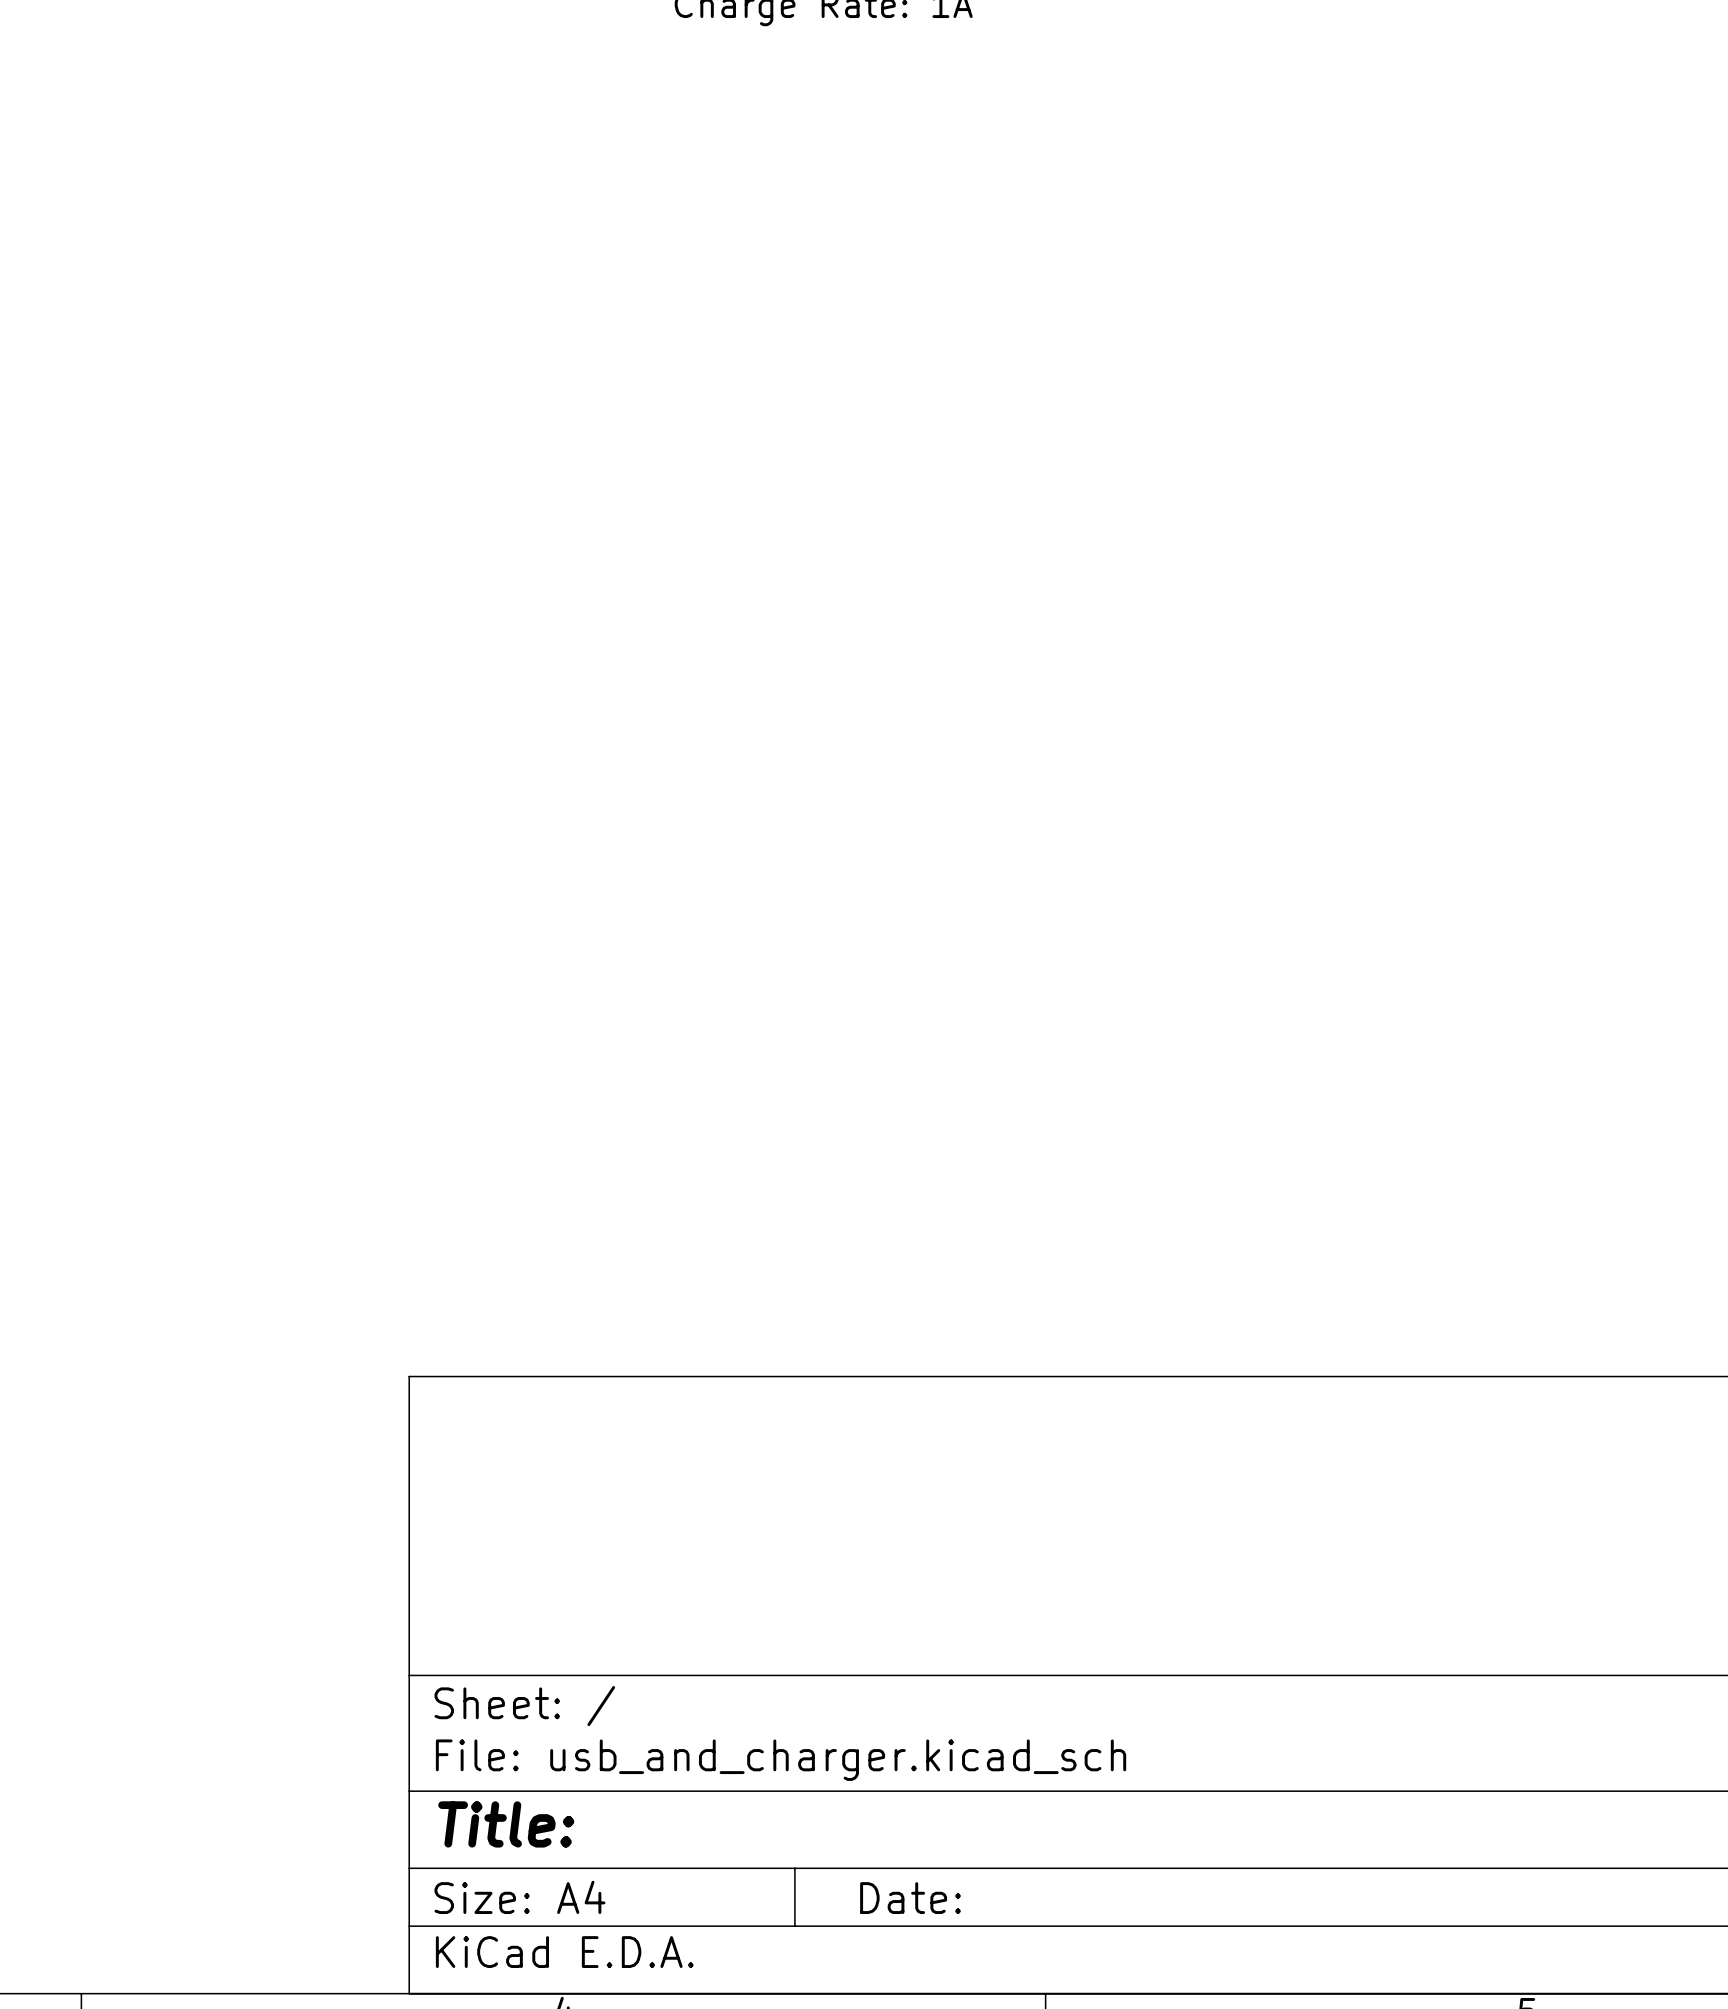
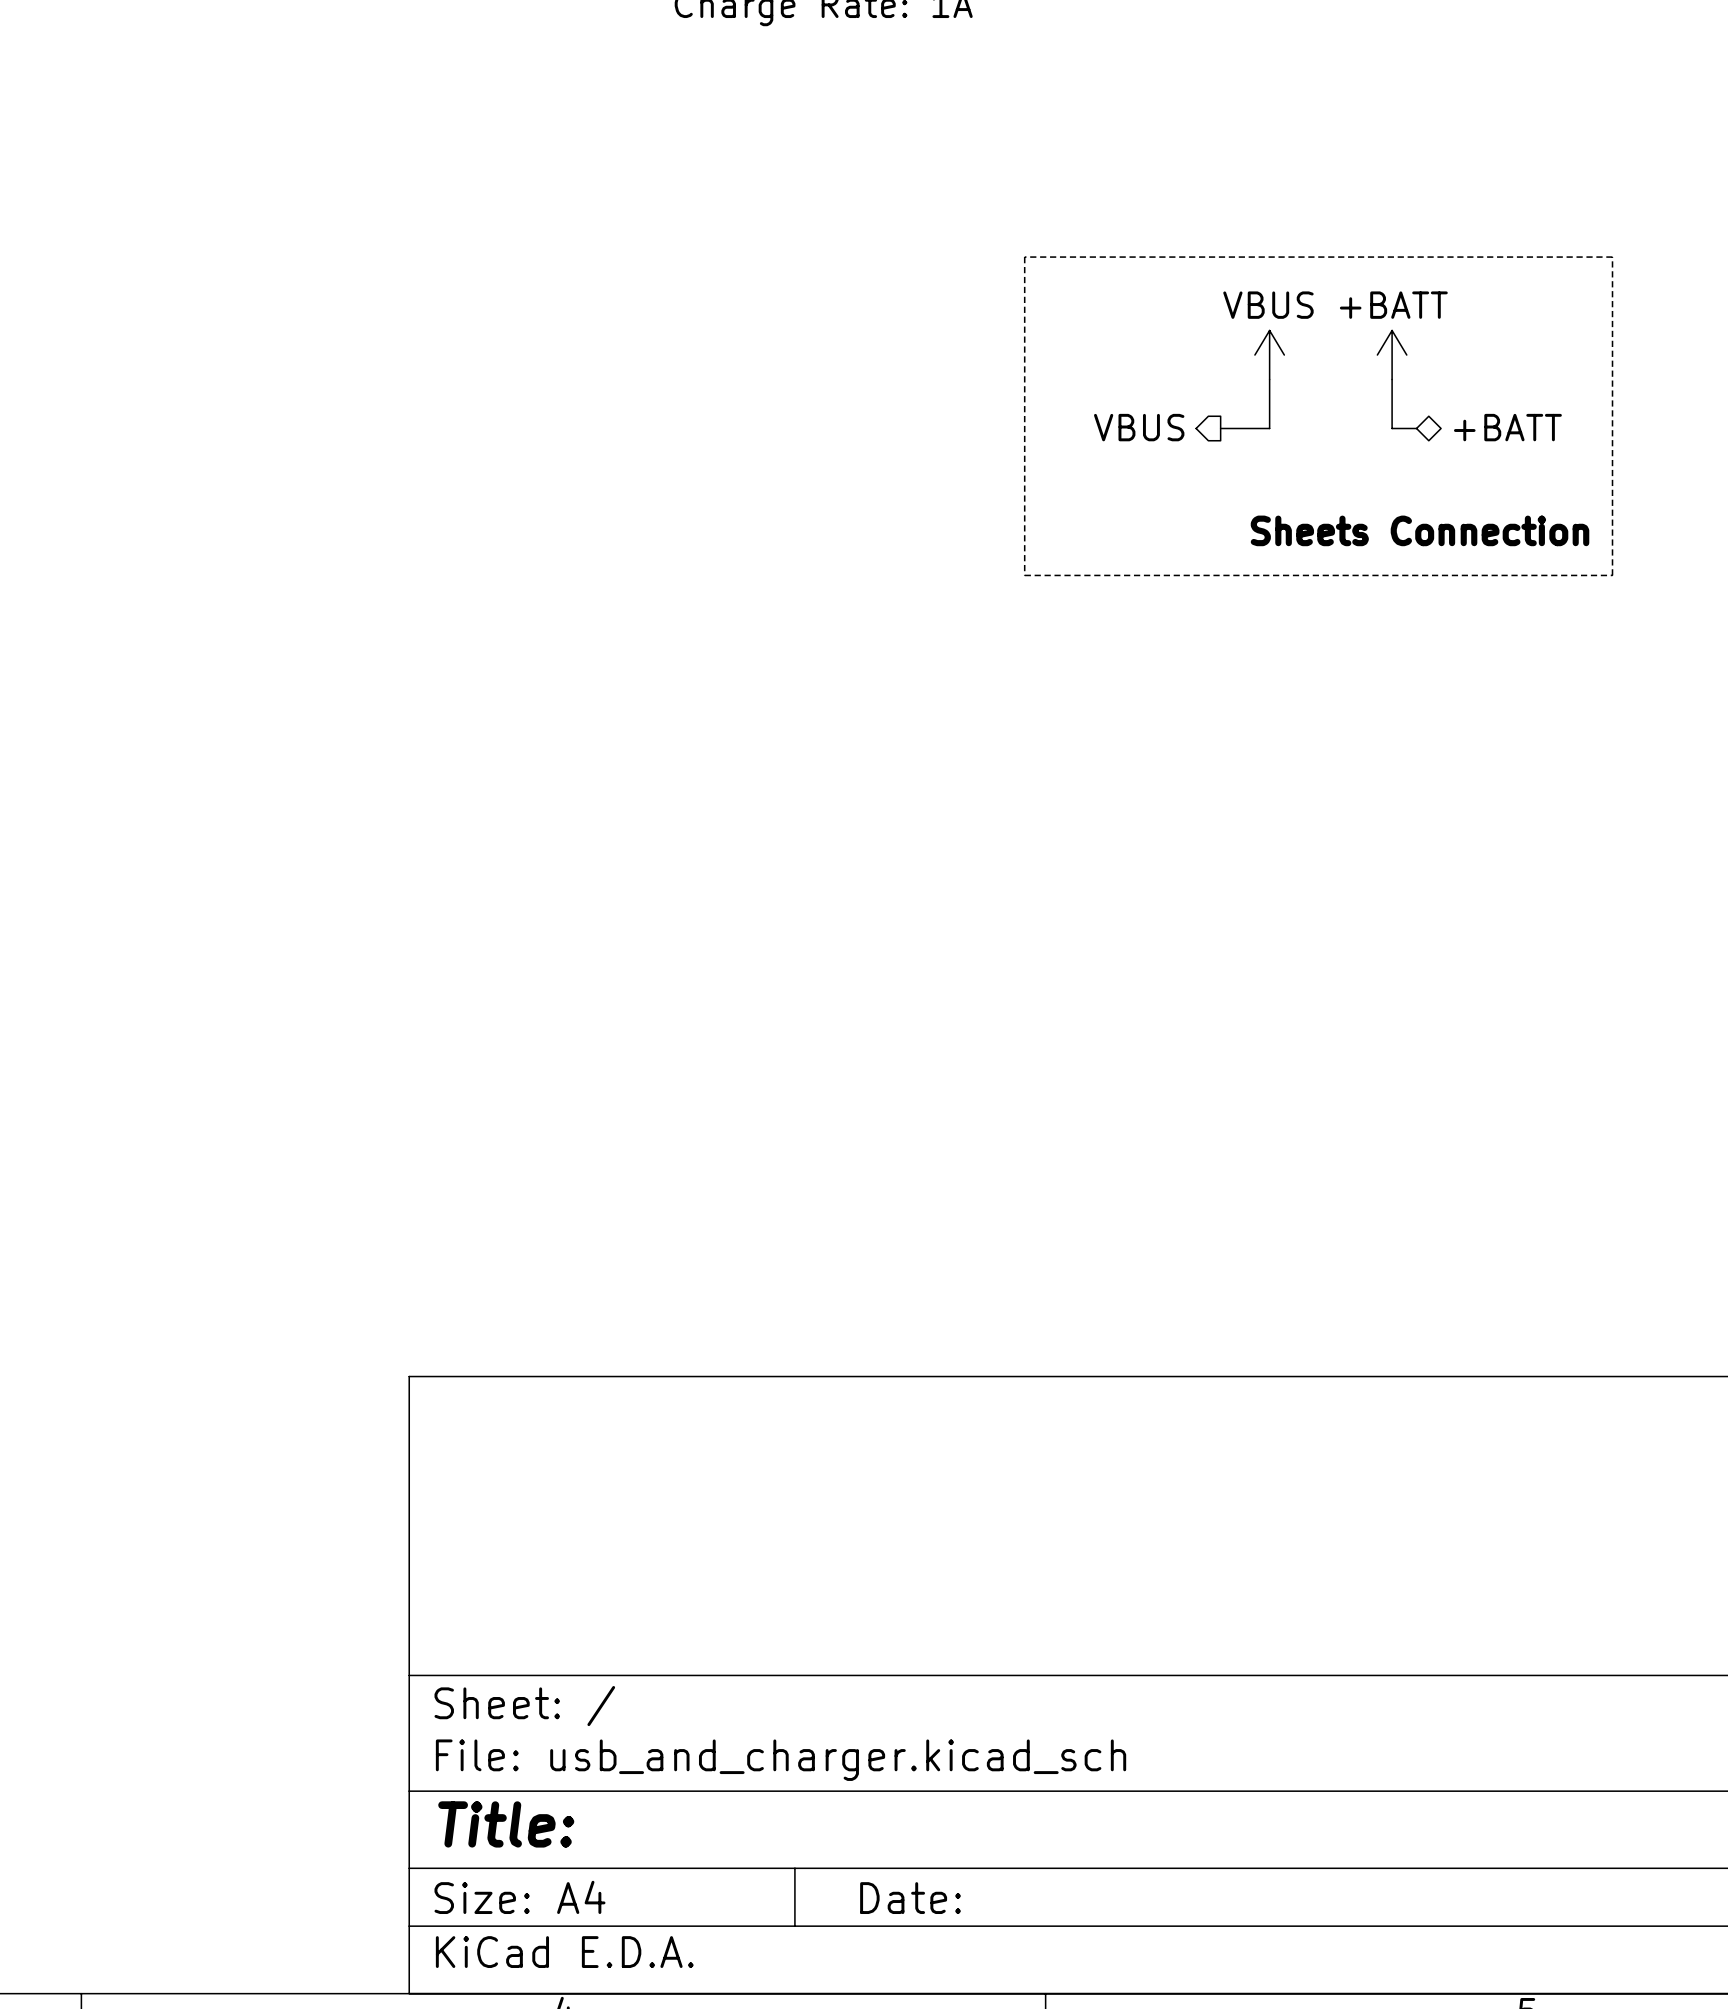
line: none -> (1024, 257) (1024, 575) (1612, 575) (1612, 257) (1024, 257)
power symbol: none -> VBUS (1269, 355)
power symbol: none -> +BATT (1392, 355)
wire: none -> (1269, 379) (1269, 428) (1220, 428)
wire: none -> (1392, 379) (1392, 428) (1416, 428)
hierarchical label: none -> VBUS (1139, 427)
hierarchical label: none -> +BATT (1507, 427)
text: none -> Sheets Connection (1420, 530)

